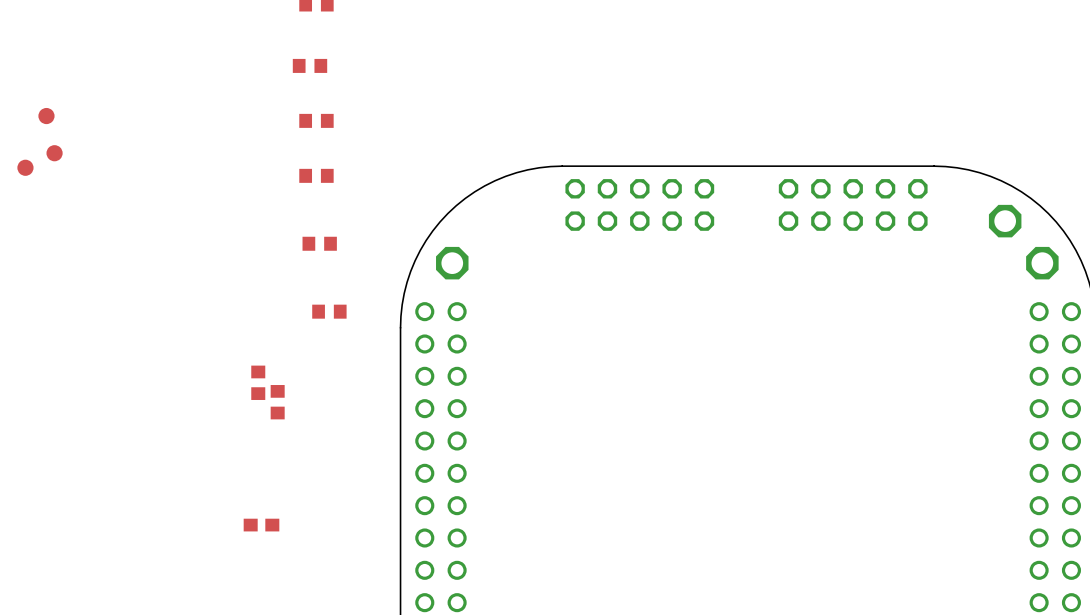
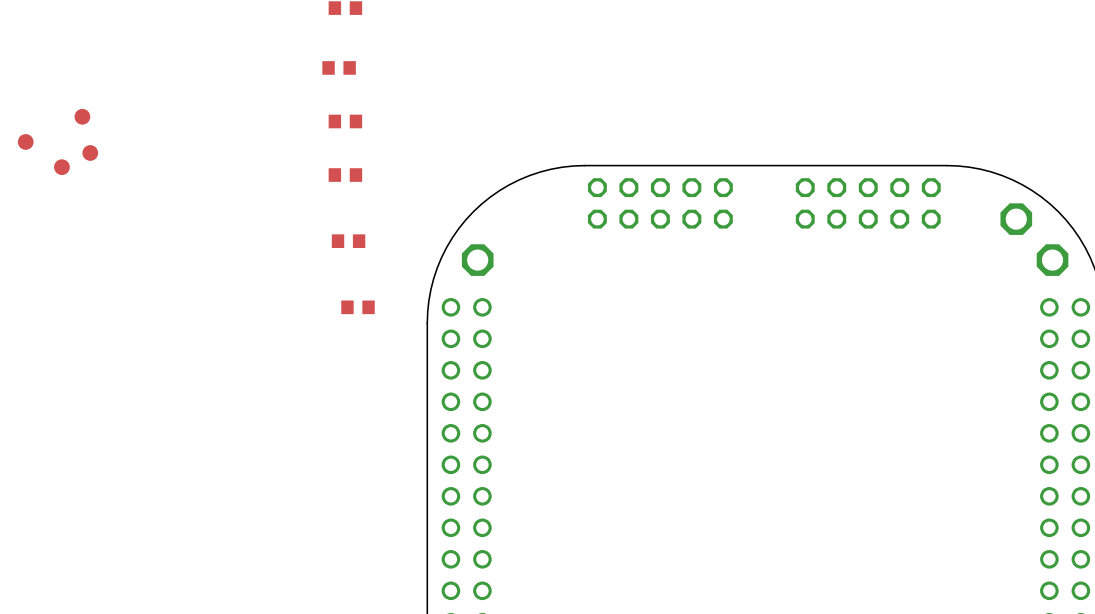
part: (258, 382) -> none
part: (277, 402) -> none
part: (261, 525) -> none

